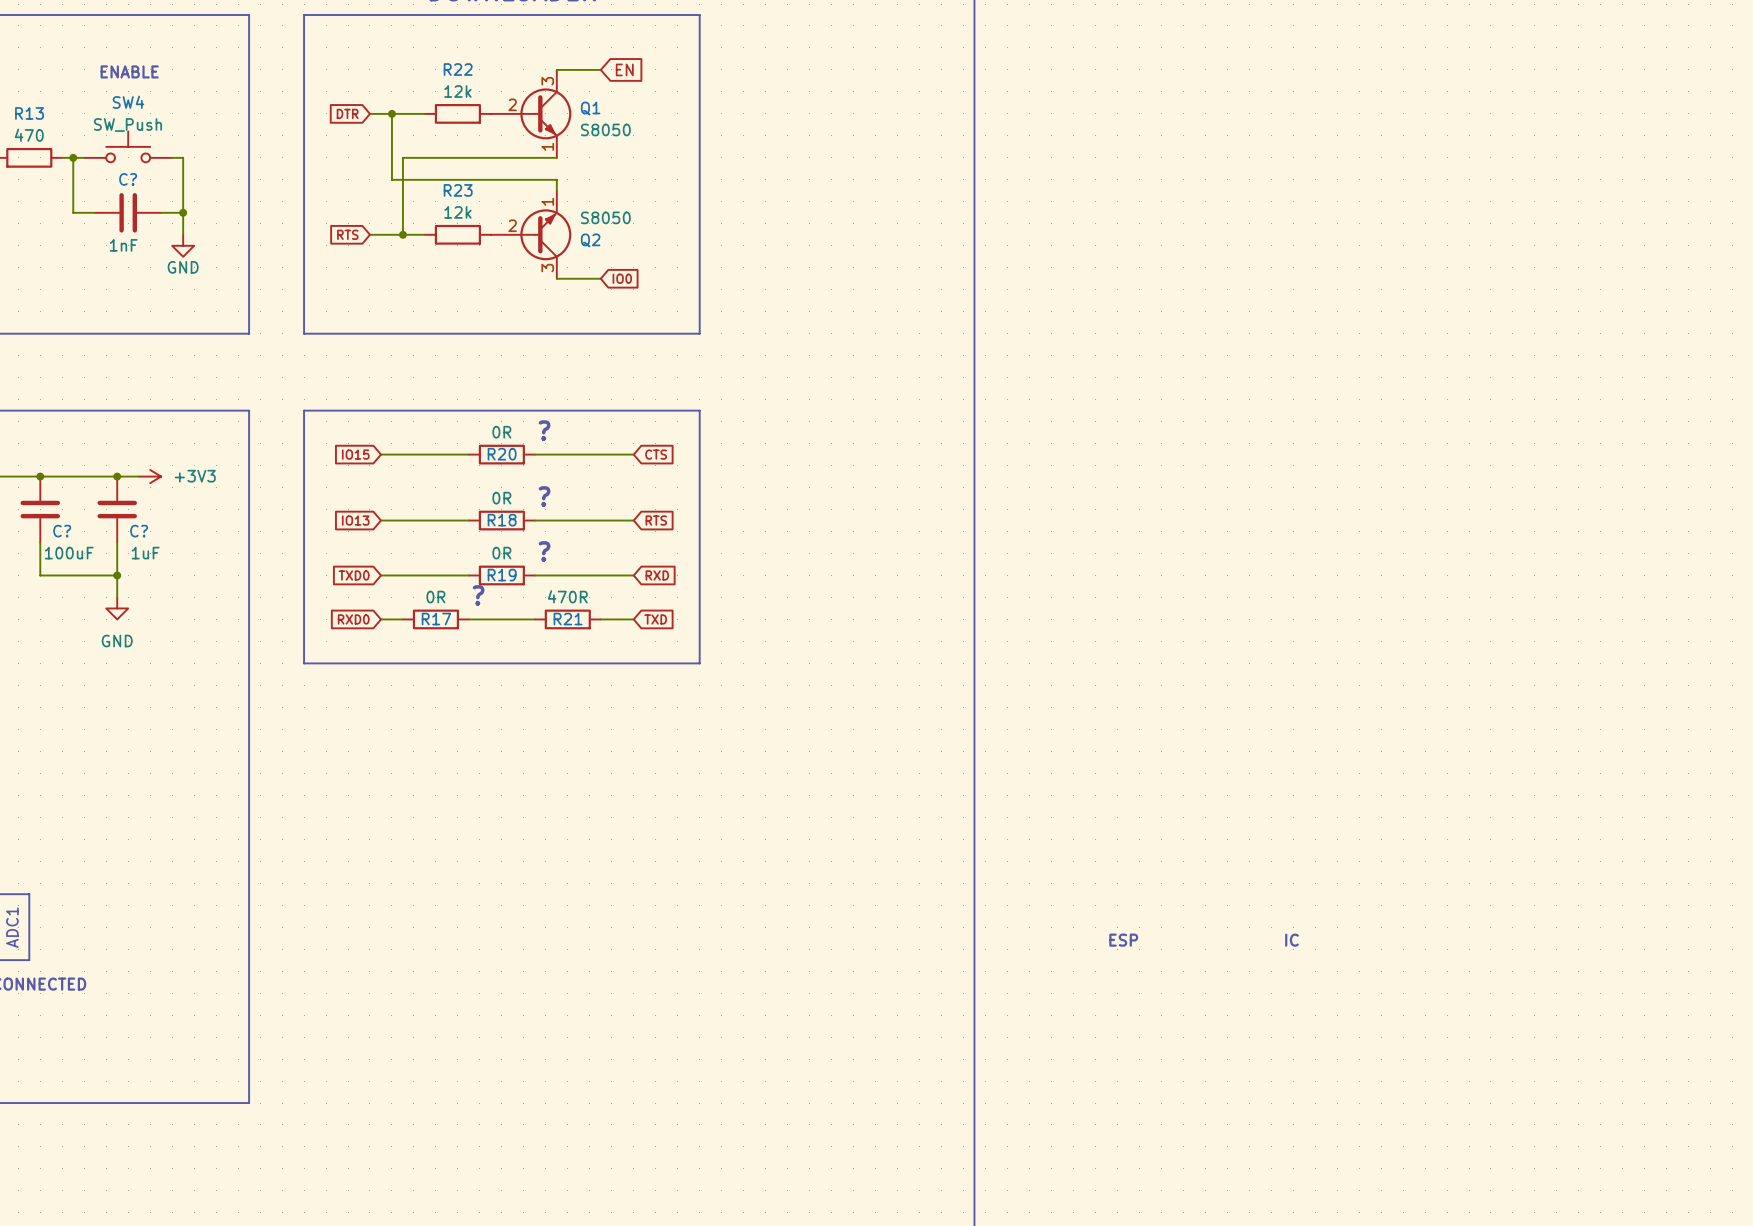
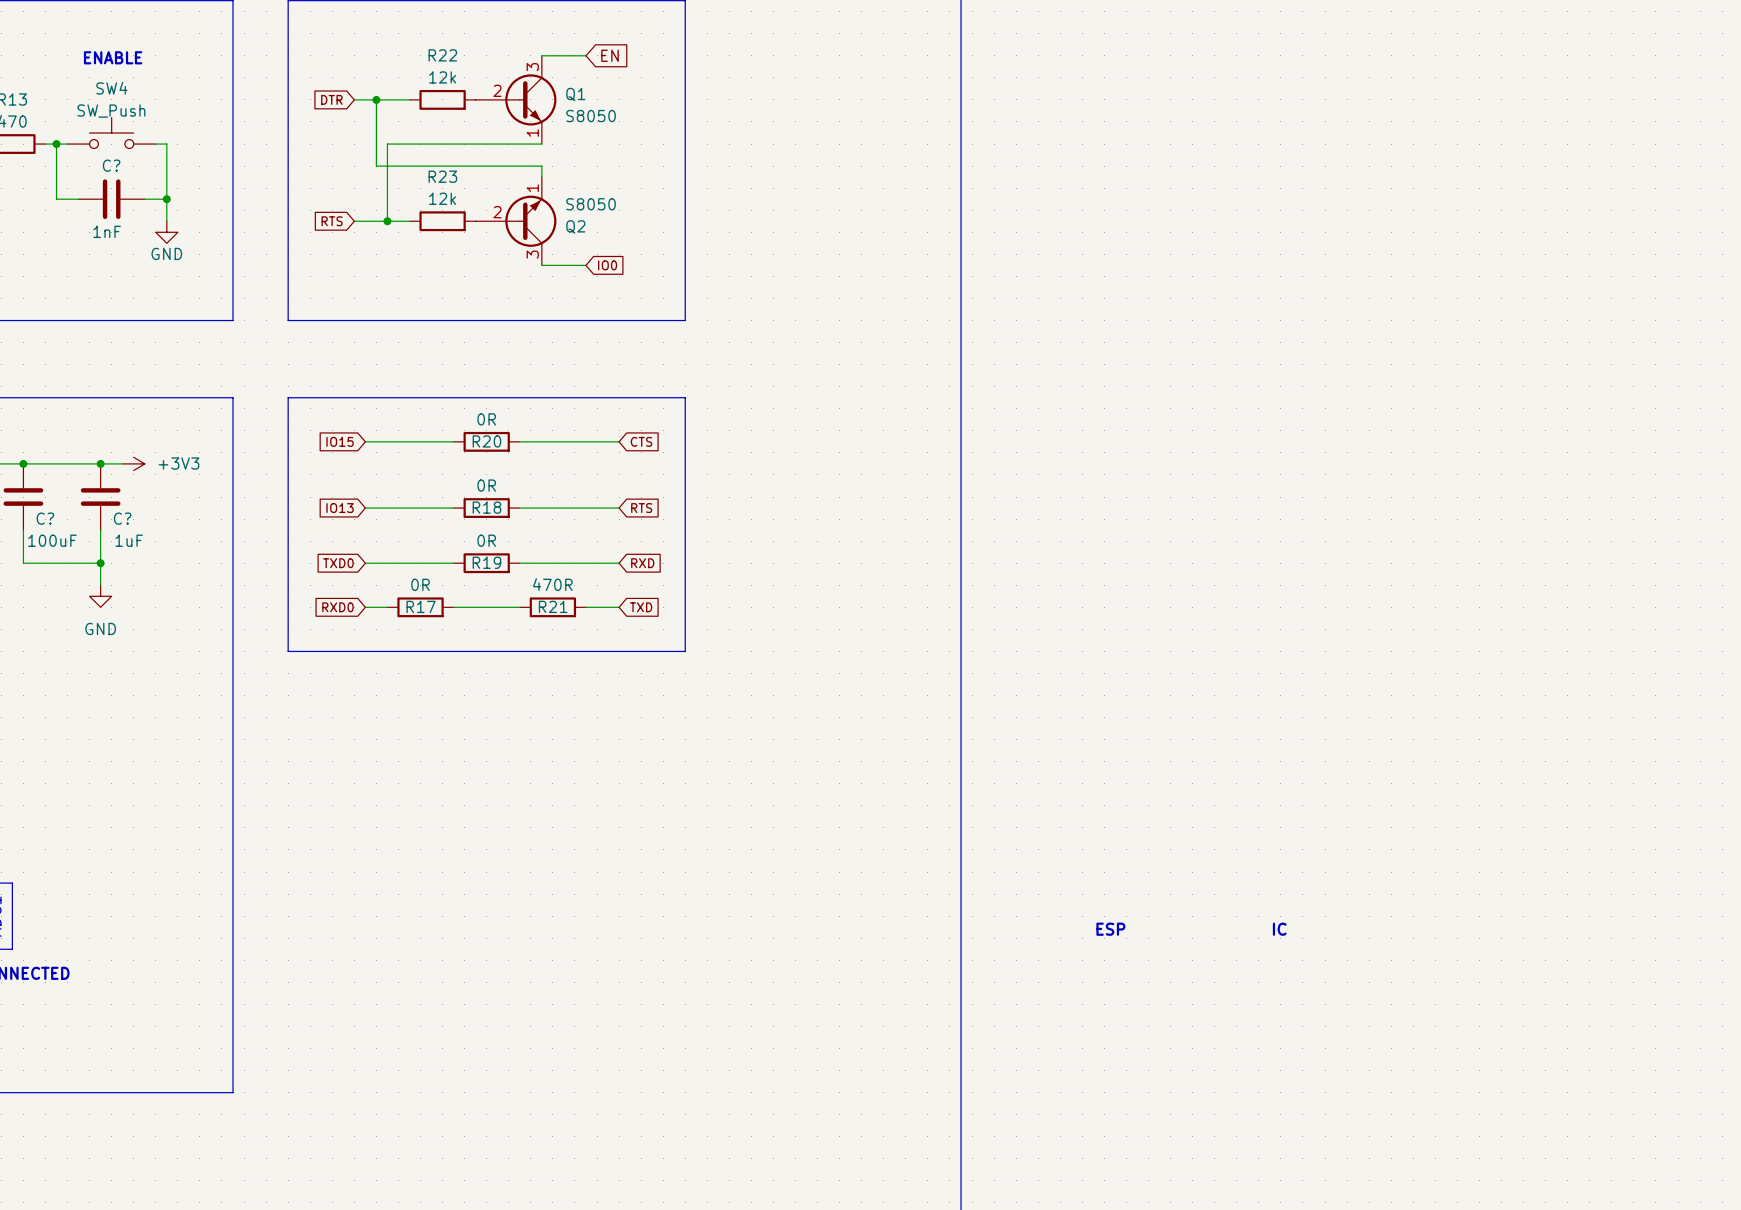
text: ? (544, 430) -> none
text: ? (544, 496) -> none
text: ? (544, 551) -> none
text: ? (478, 595) -> none

